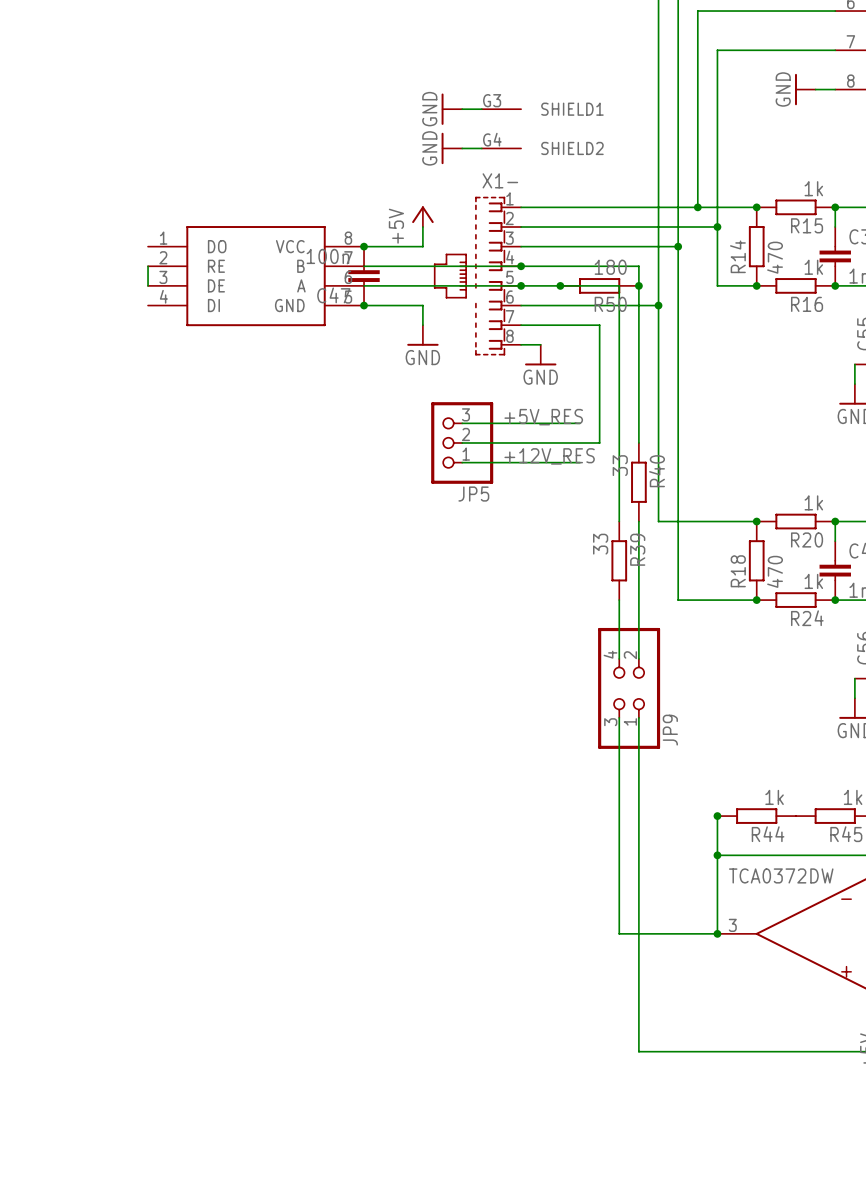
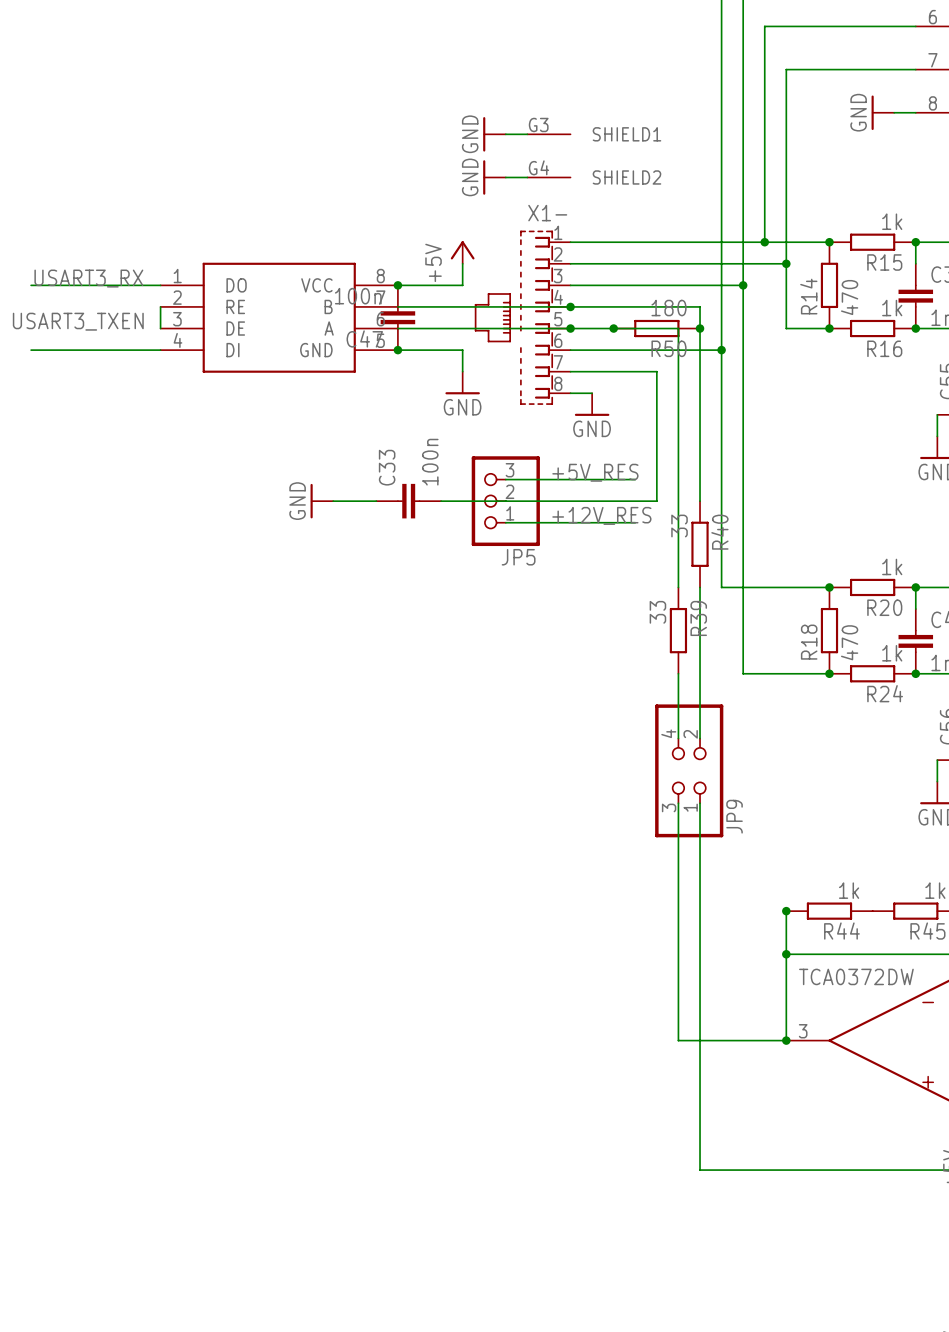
label: none -> USART3_RX (88, 278)
wire: none -> (31, 285) (160, 285)
label: none -> USART3_TXEN (78, 321)
wire: none -> (31, 350) (160, 350)
power symbol: none -> GND (321, 501)
wire: none -> (333, 501) (376, 501)
C33: none -> 100n (408, 501)
wire: none -> (441, 501) (505, 501)

